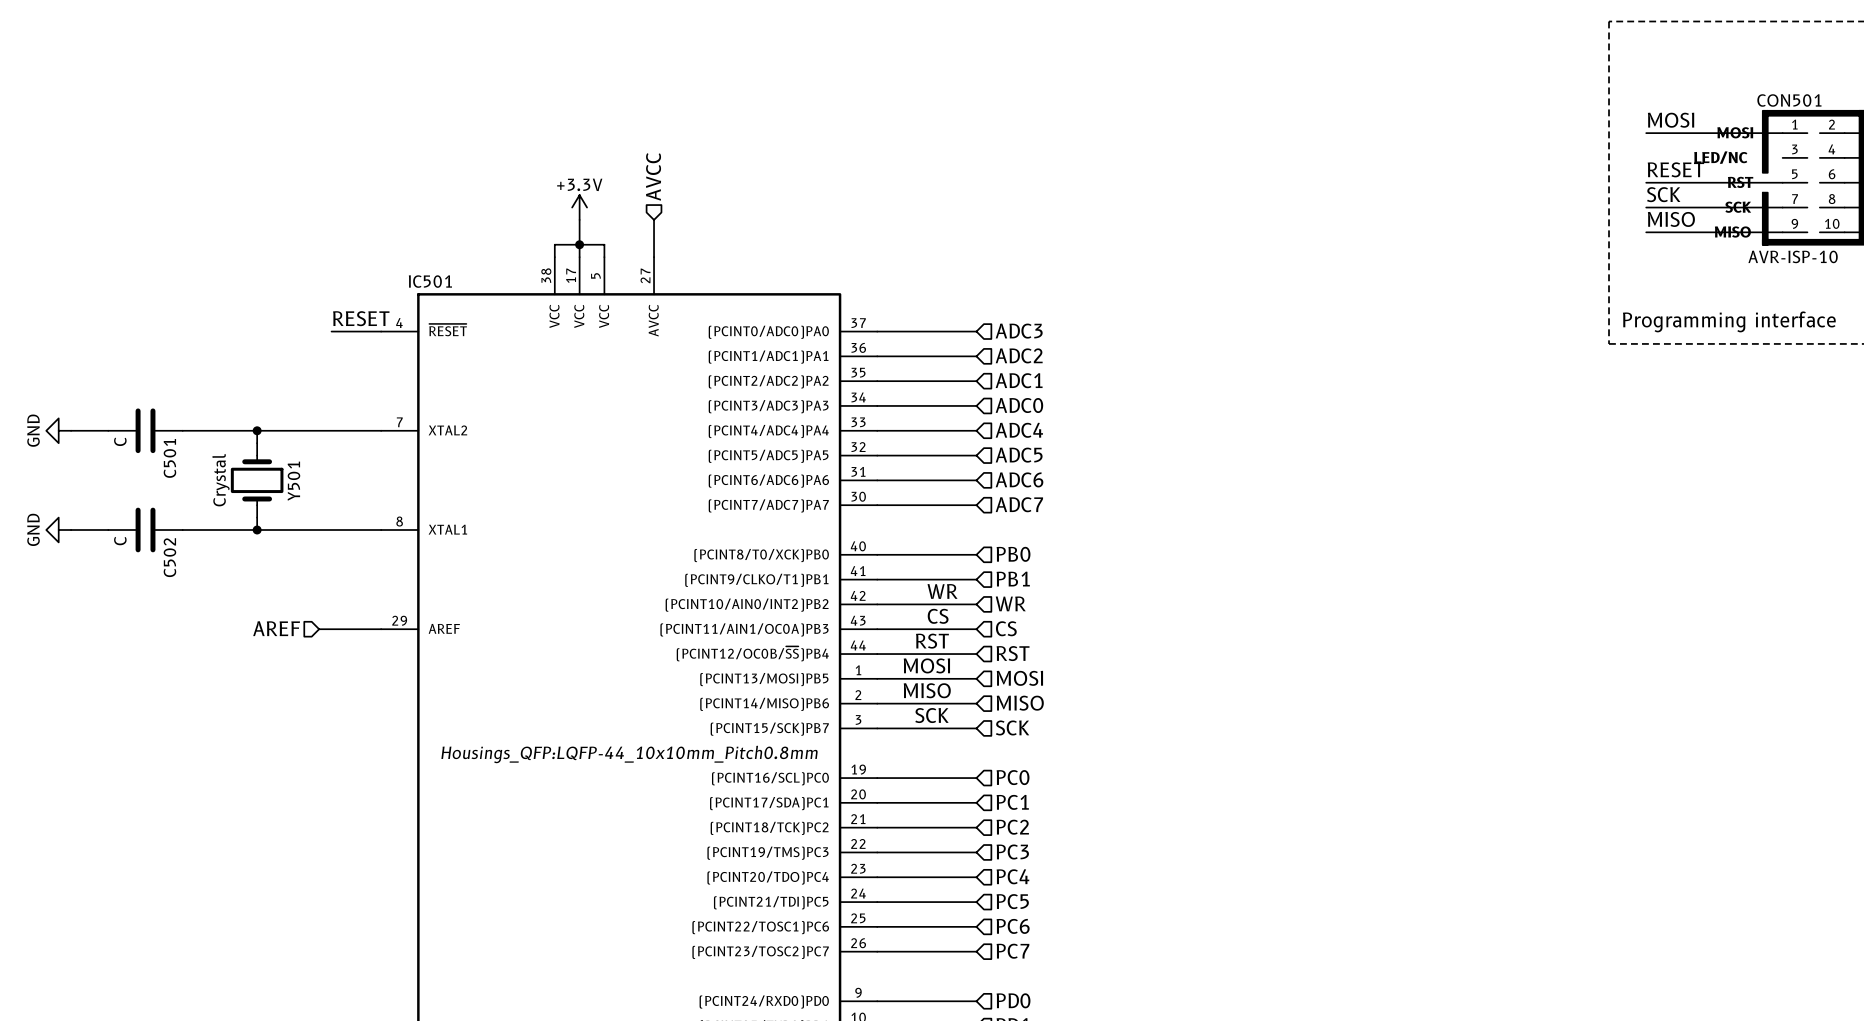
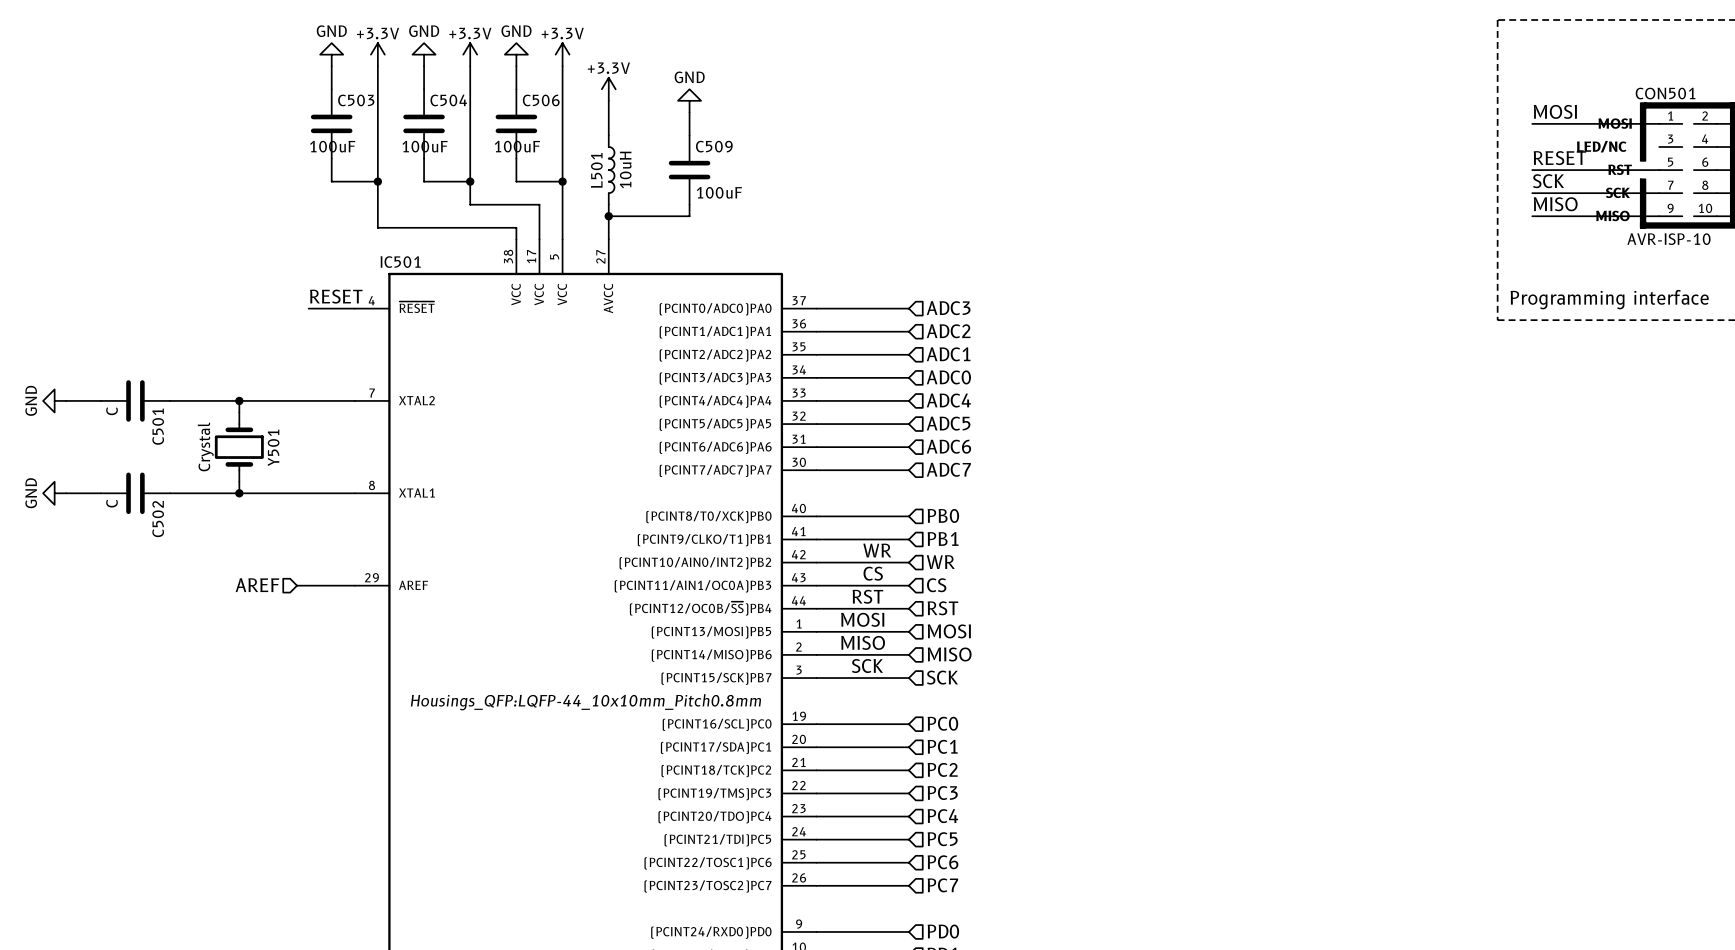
power symbol: none -> GND (331, 54)
power symbol: none -> +3.3V (377, 54)
power symbol: none -> GND (424, 54)
power symbol: none -> +3.3V (470, 54)
power symbol: none -> GND (516, 54)
power symbol: none -> +3.3V (562, 54)
wire: none -> (331, 66) (331, 89)
wire: none -> (377, 66) (377, 227) (516, 227)
wire: none -> (424, 66) (424, 89)
wire: none -> (470, 66) (470, 204) (539, 204)
wire: none -> (516, 66) (516, 89)
power symbol: none -> +3.3V (608, 89)
wire: none -> (608, 100) (608, 135)
power symbol: none -> GND (689, 100)
wire: none -> (689, 112) (689, 135)
C503: none -> 100uF (331, 123)
C504: none -> 100uF (424, 123)
C506: none -> 100uF (516, 123)
wire: none -> (331, 158) (331, 181) (377, 181)
wire: none -> (424, 158) (424, 181) (470, 181)
wire: none -> (516, 158) (516, 181) (562, 181)
hierarchical label: AVCC (653, 176) -> none
L501: none -> 10uH (611, 170)
C509: none -> 100uF (689, 170)
junction: none -> (377, 181)
junction: none -> (470, 181)
junction: none -> (562, 181)
power symbol: +3.3V (579, 207) -> none
wire: none -> (689, 204) (689, 216) (608, 216)
junction: none -> (608, 216)
wire: (554, 244) (604, 244) -> (562, 66) (562, 227)
junction: (579, 244) -> none

